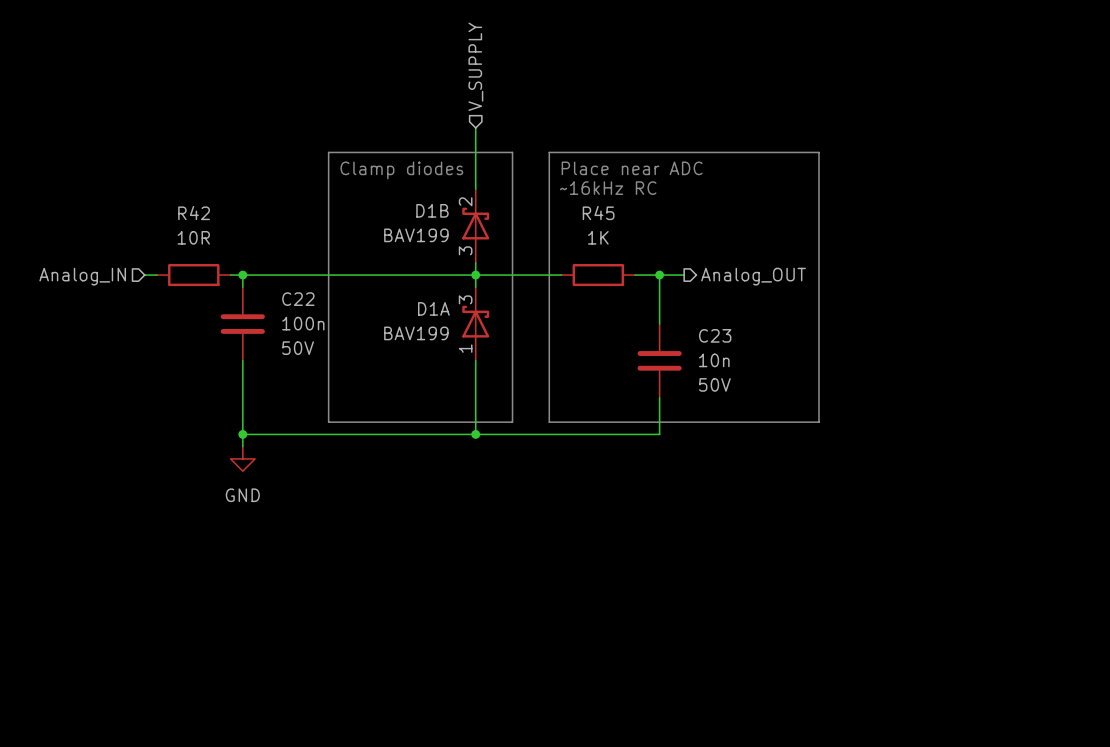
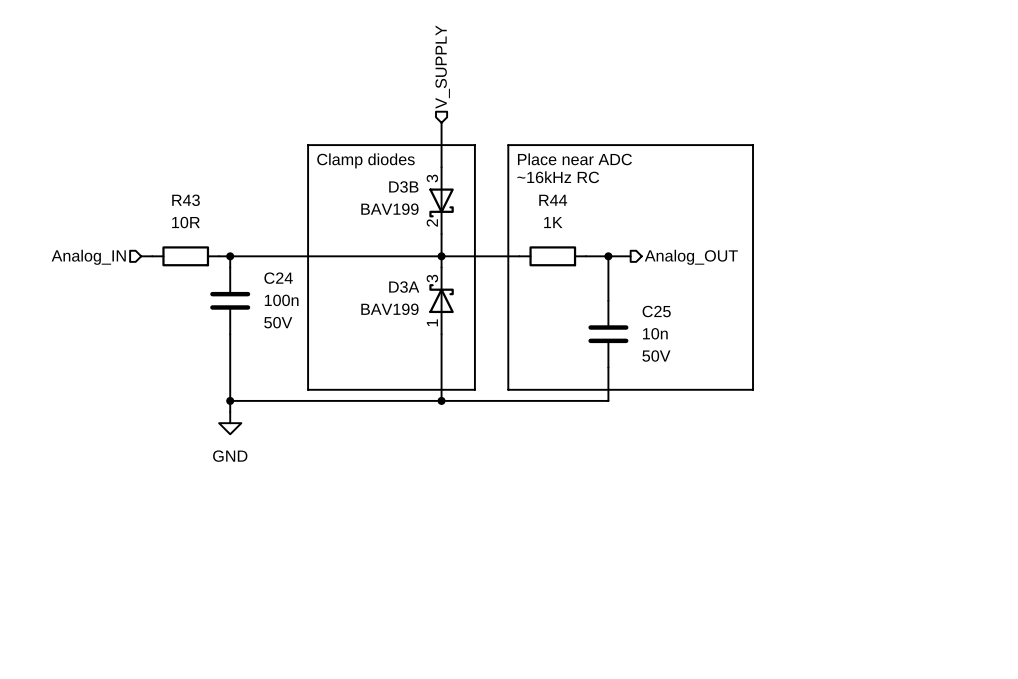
R42 name: R42 (194, 213) -> R43 (186, 200)
D3B: none -> BAV199 (441, 200)
R45 name: R45 (598, 213) -> R44 (553, 200)
D1B: BAV199 (475, 226) -> none
C22 name: C22 (298, 299) -> C24 (278, 278)
D1A name: D1A (433, 308) -> D3A (404, 287)
C23 name: C23 (715, 335) -> C25 (656, 311)

